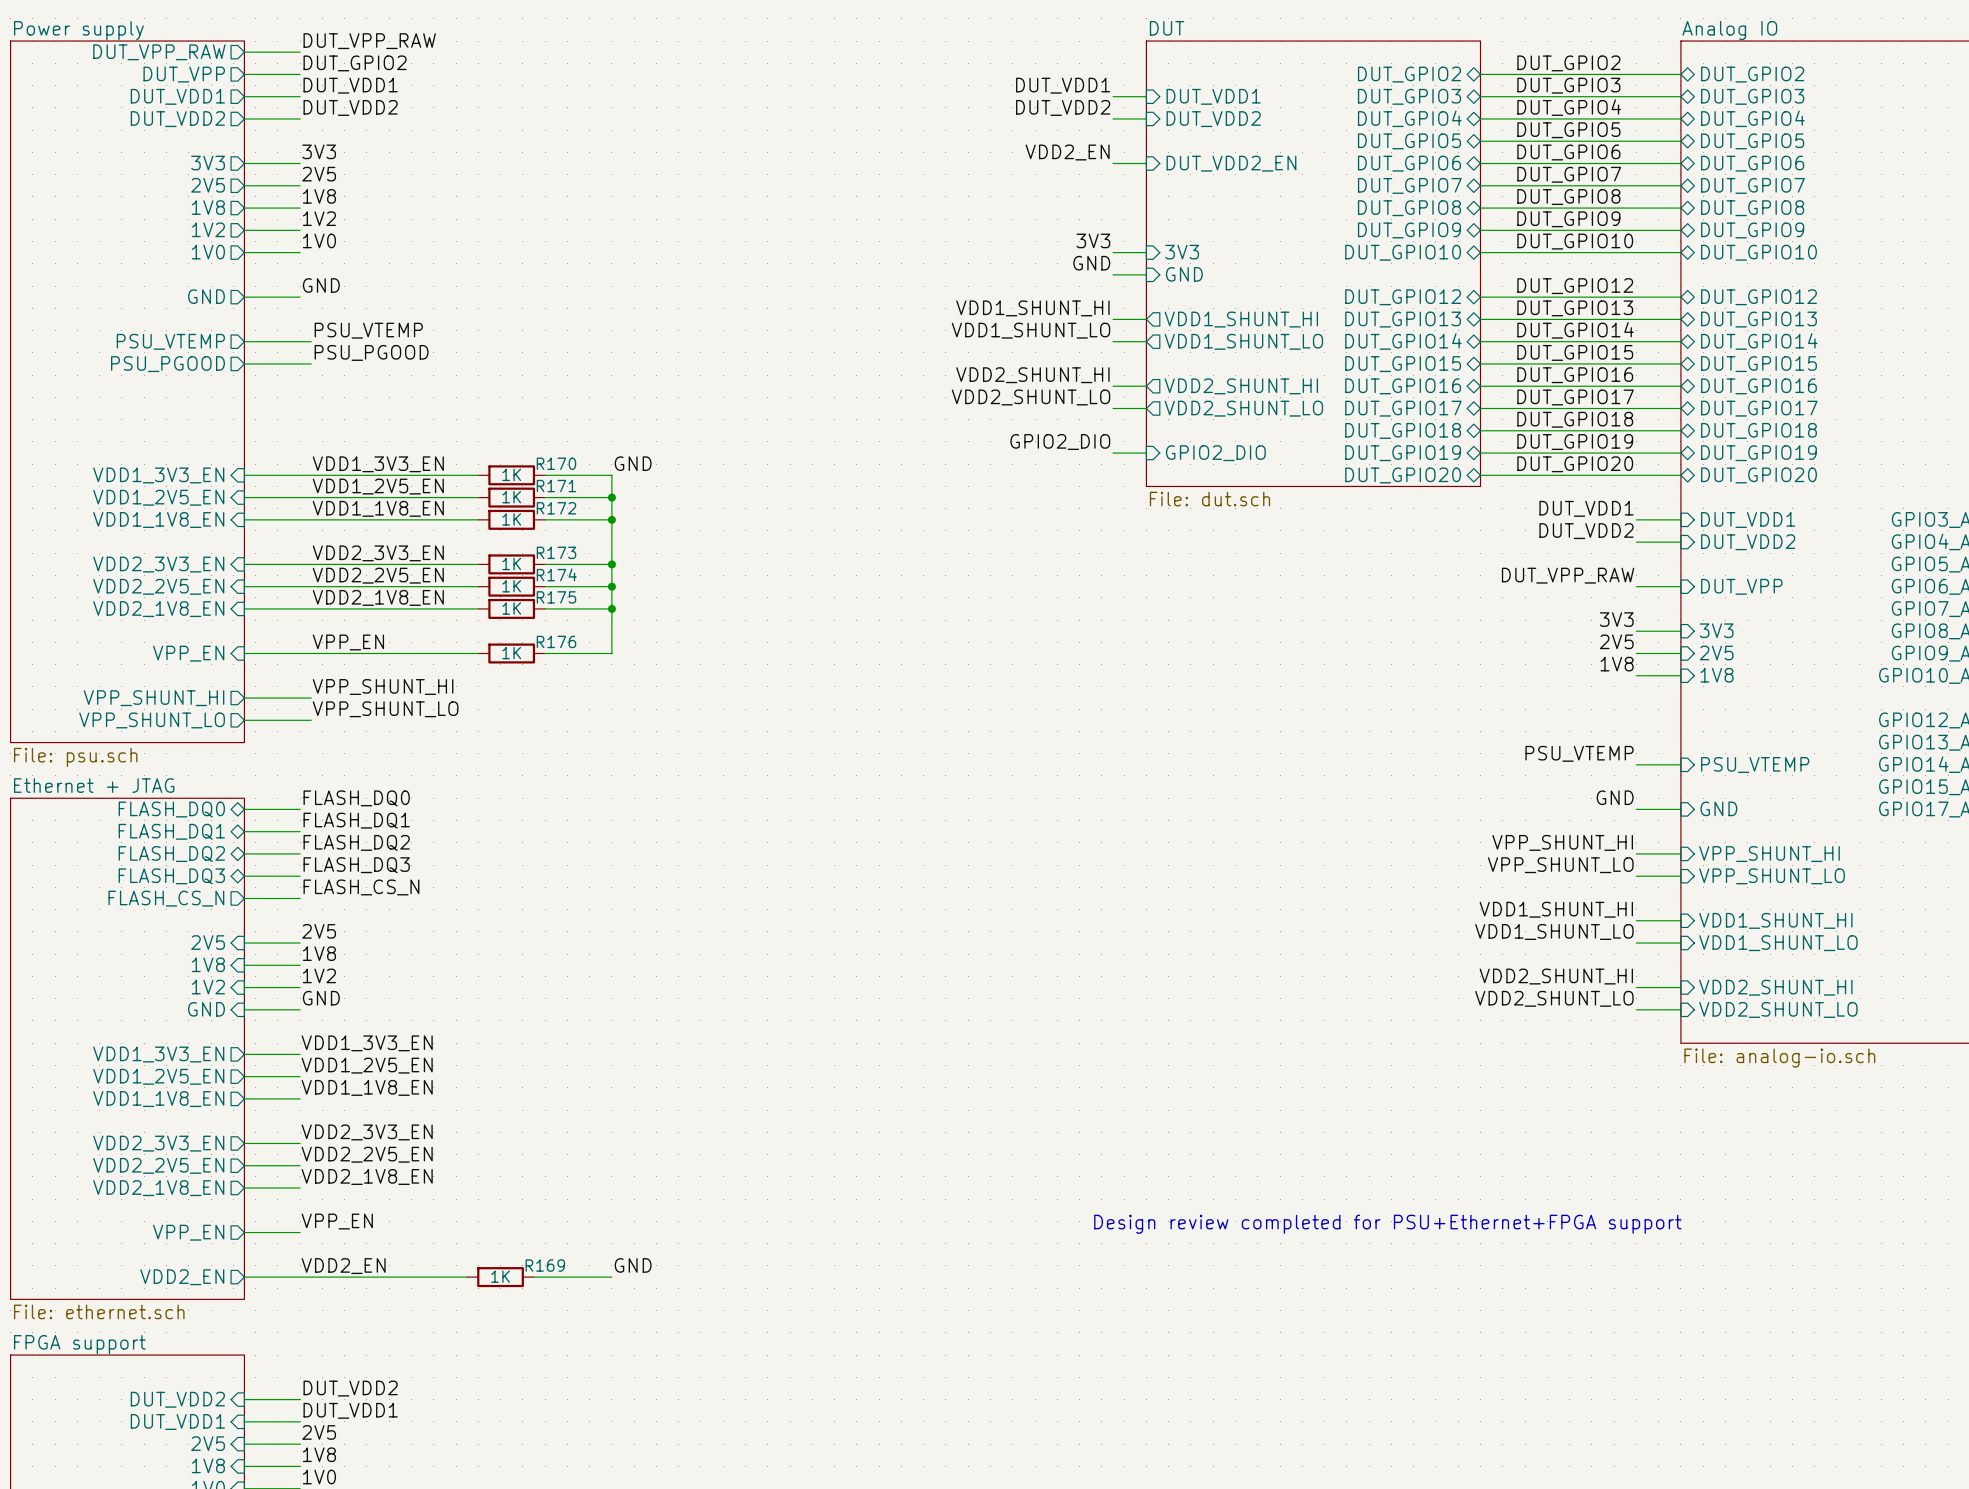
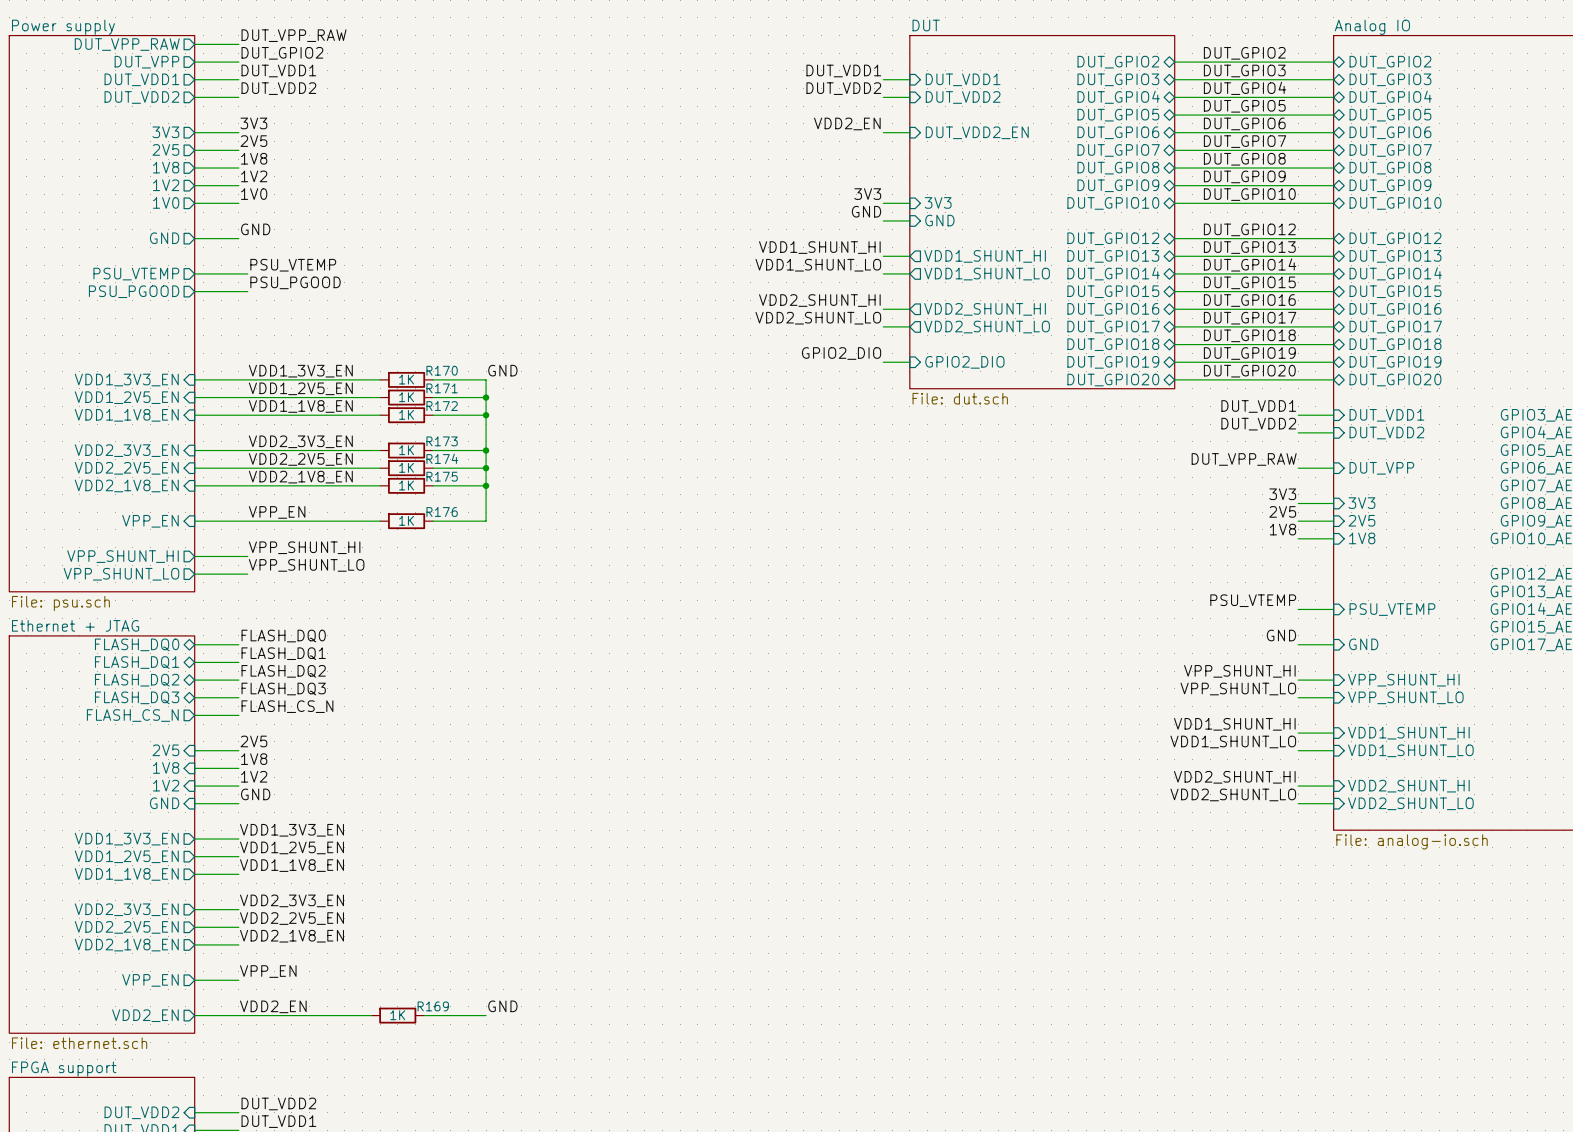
text: Design review completed for PSU+Ethernet+FPGA support (1387, 1224) -> none

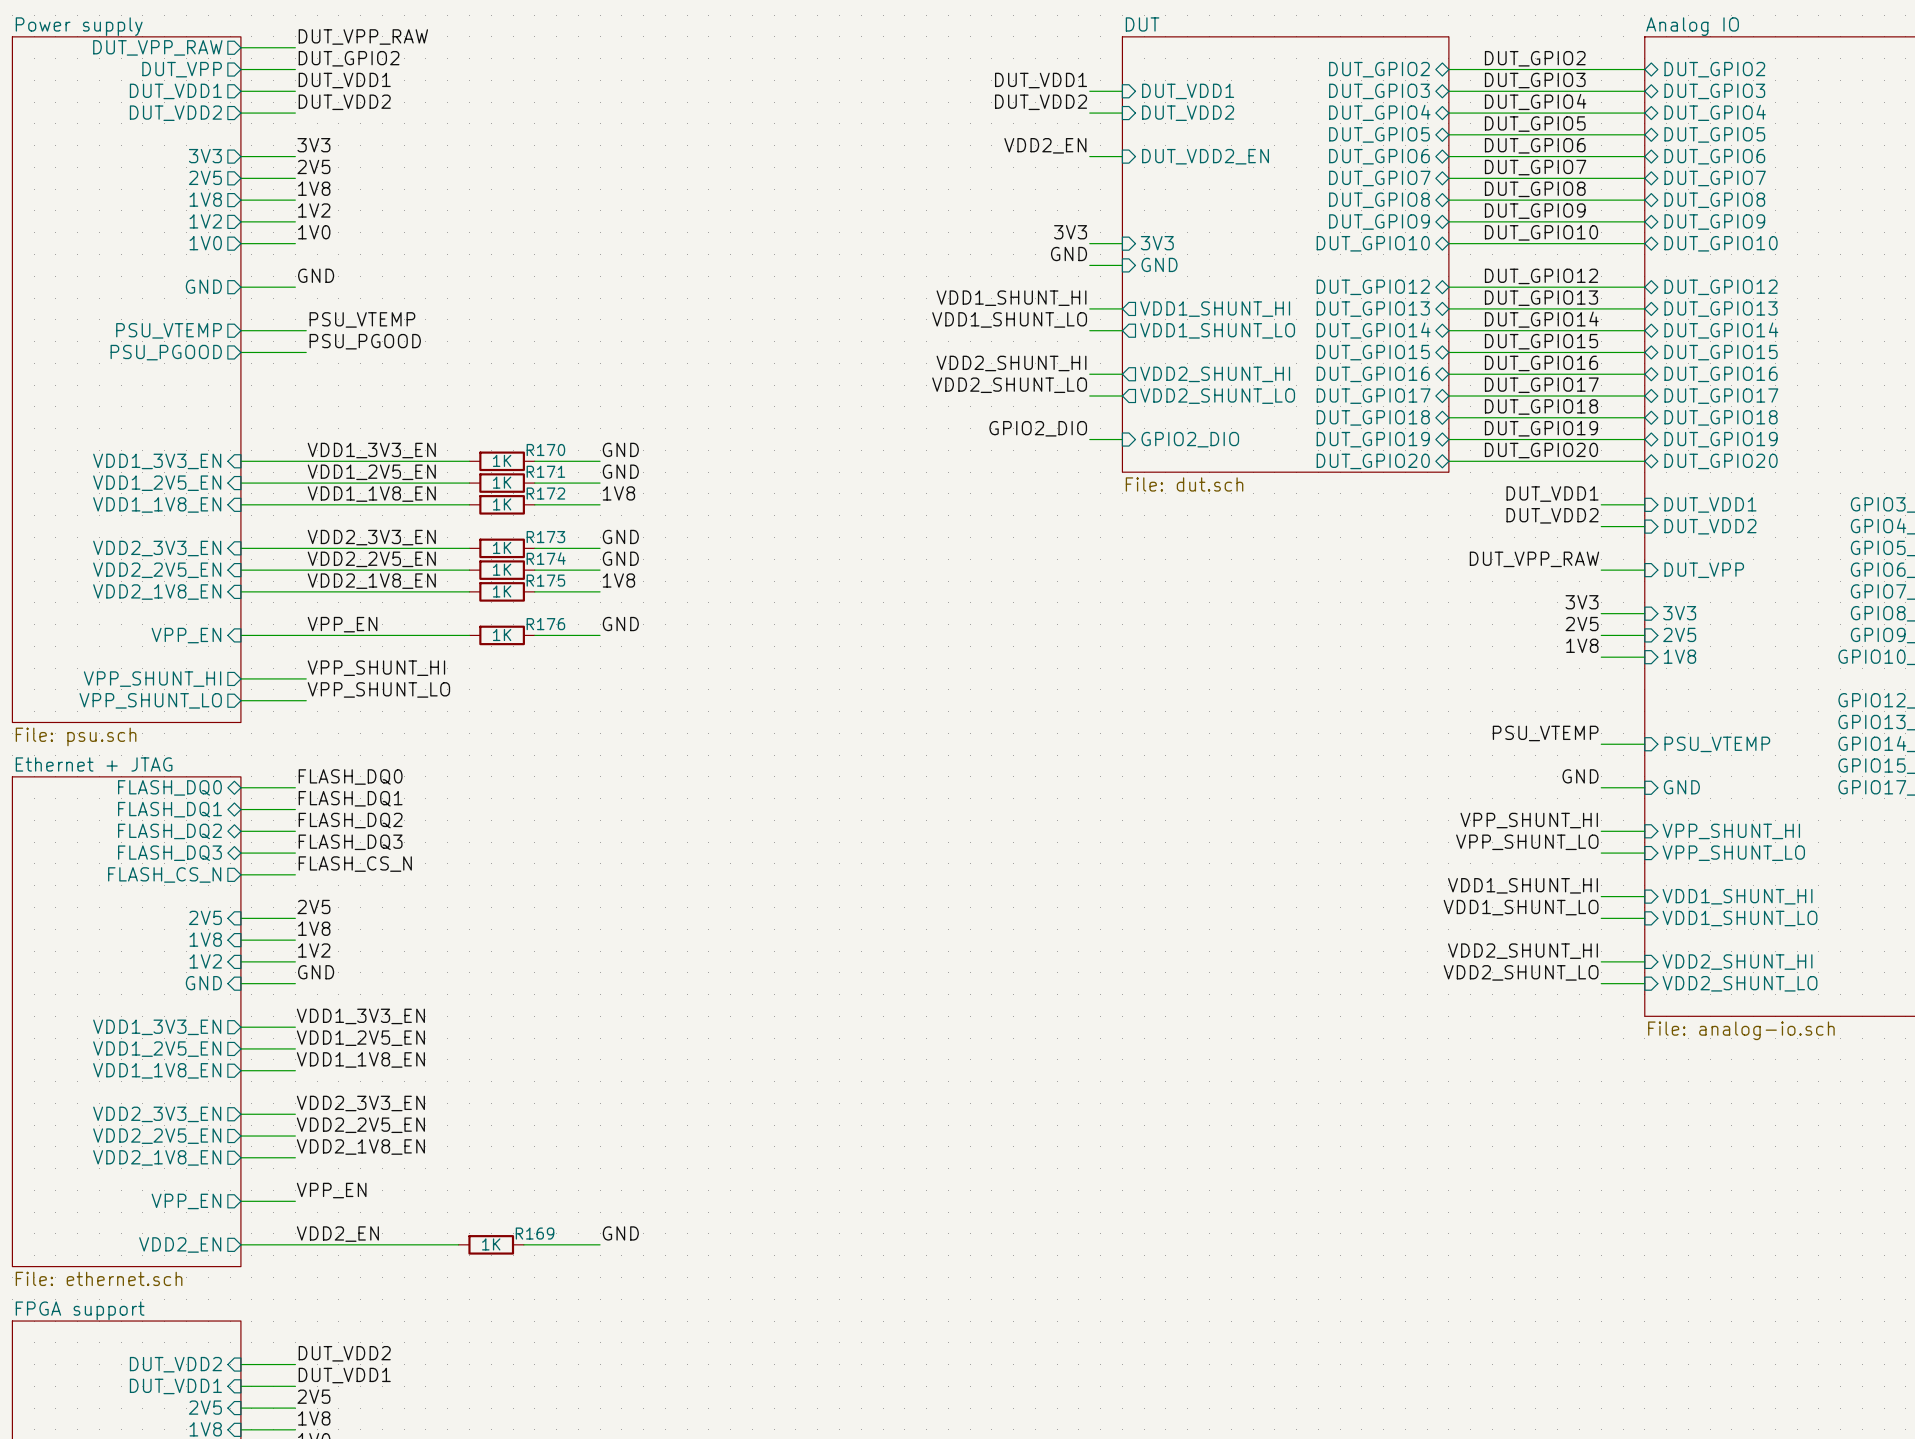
wire: (486, 379) (486, 521) -> none
label: none -> GND (620, 471)
junction: (486, 397) -> none
label: none -> 1V8 (618, 493)
junction: (486, 415) -> none
label: none -> GND (620, 536)
junction: (486, 450) -> none
label: none -> GND (620, 558)
junction: (486, 468) -> none
label: none -> 1V8 (618, 580)
junction: (486, 485) -> none
label: none -> GND (620, 624)

